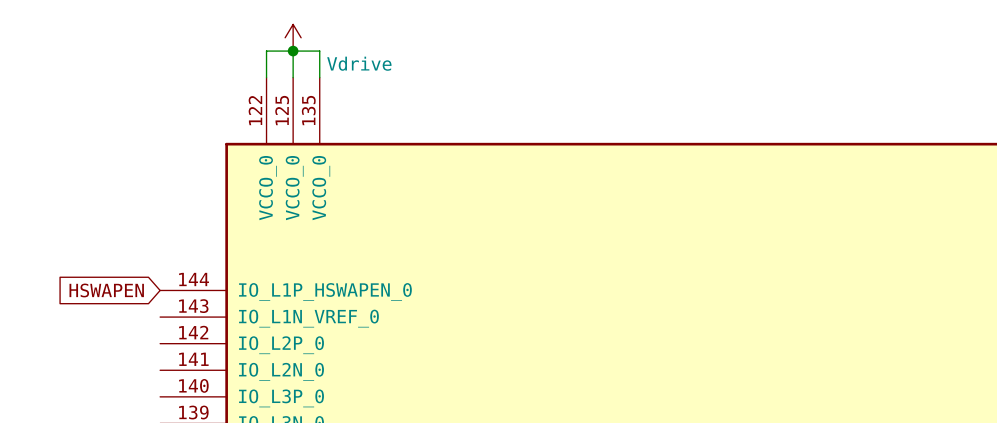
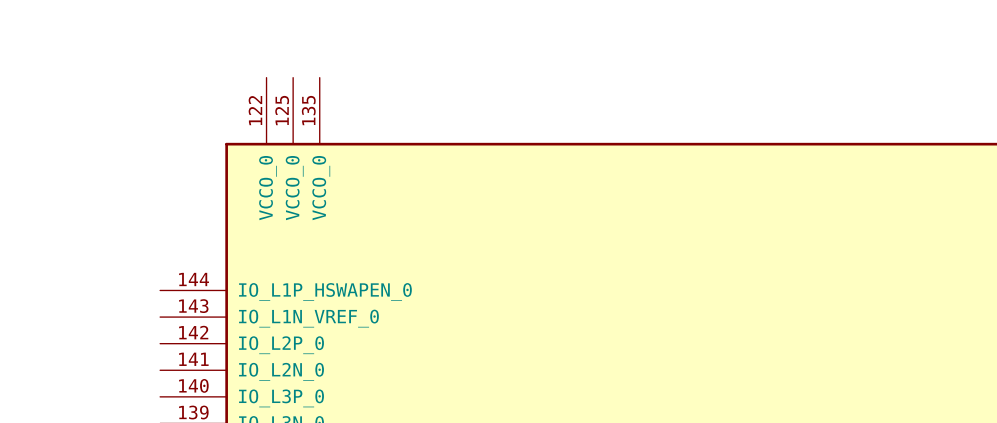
power symbol: Vdrive (293, 37) -> none
wire: (293, 51) (293, 77) -> none
junction: (293, 51) -> none
wire: (266, 77) (266, 51) (319, 51) (319, 77) -> none
global label: HSWAPEN (106, 290) -> none

